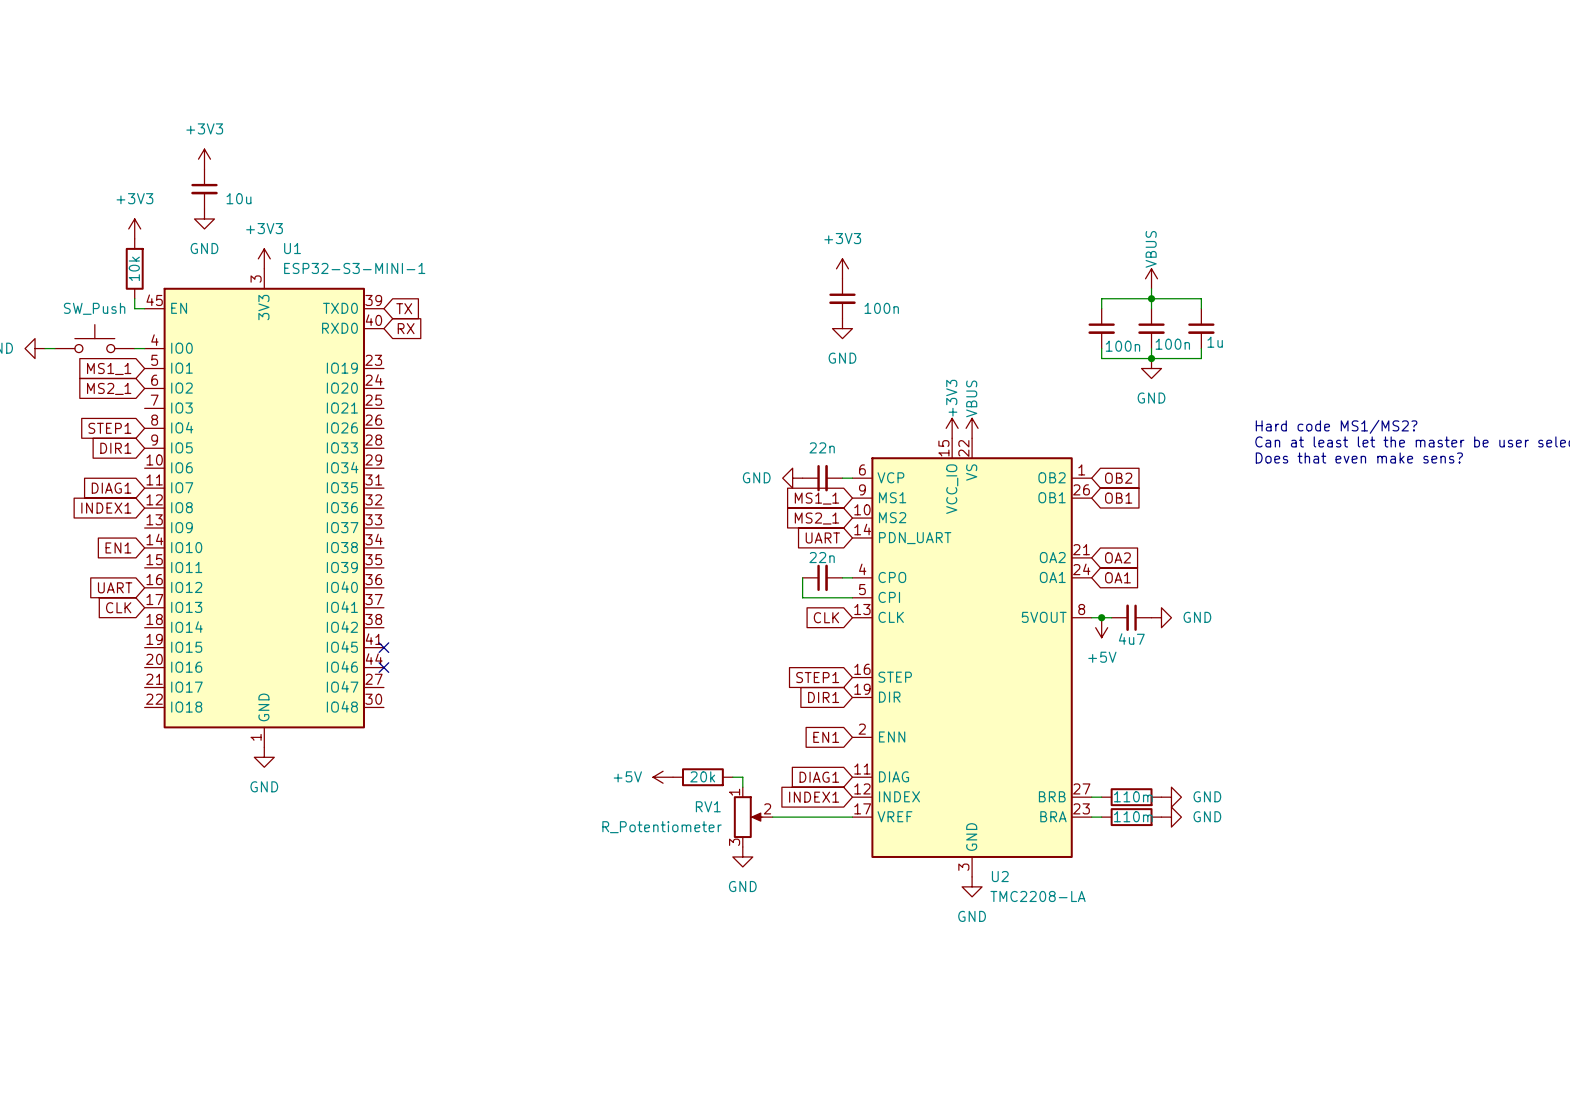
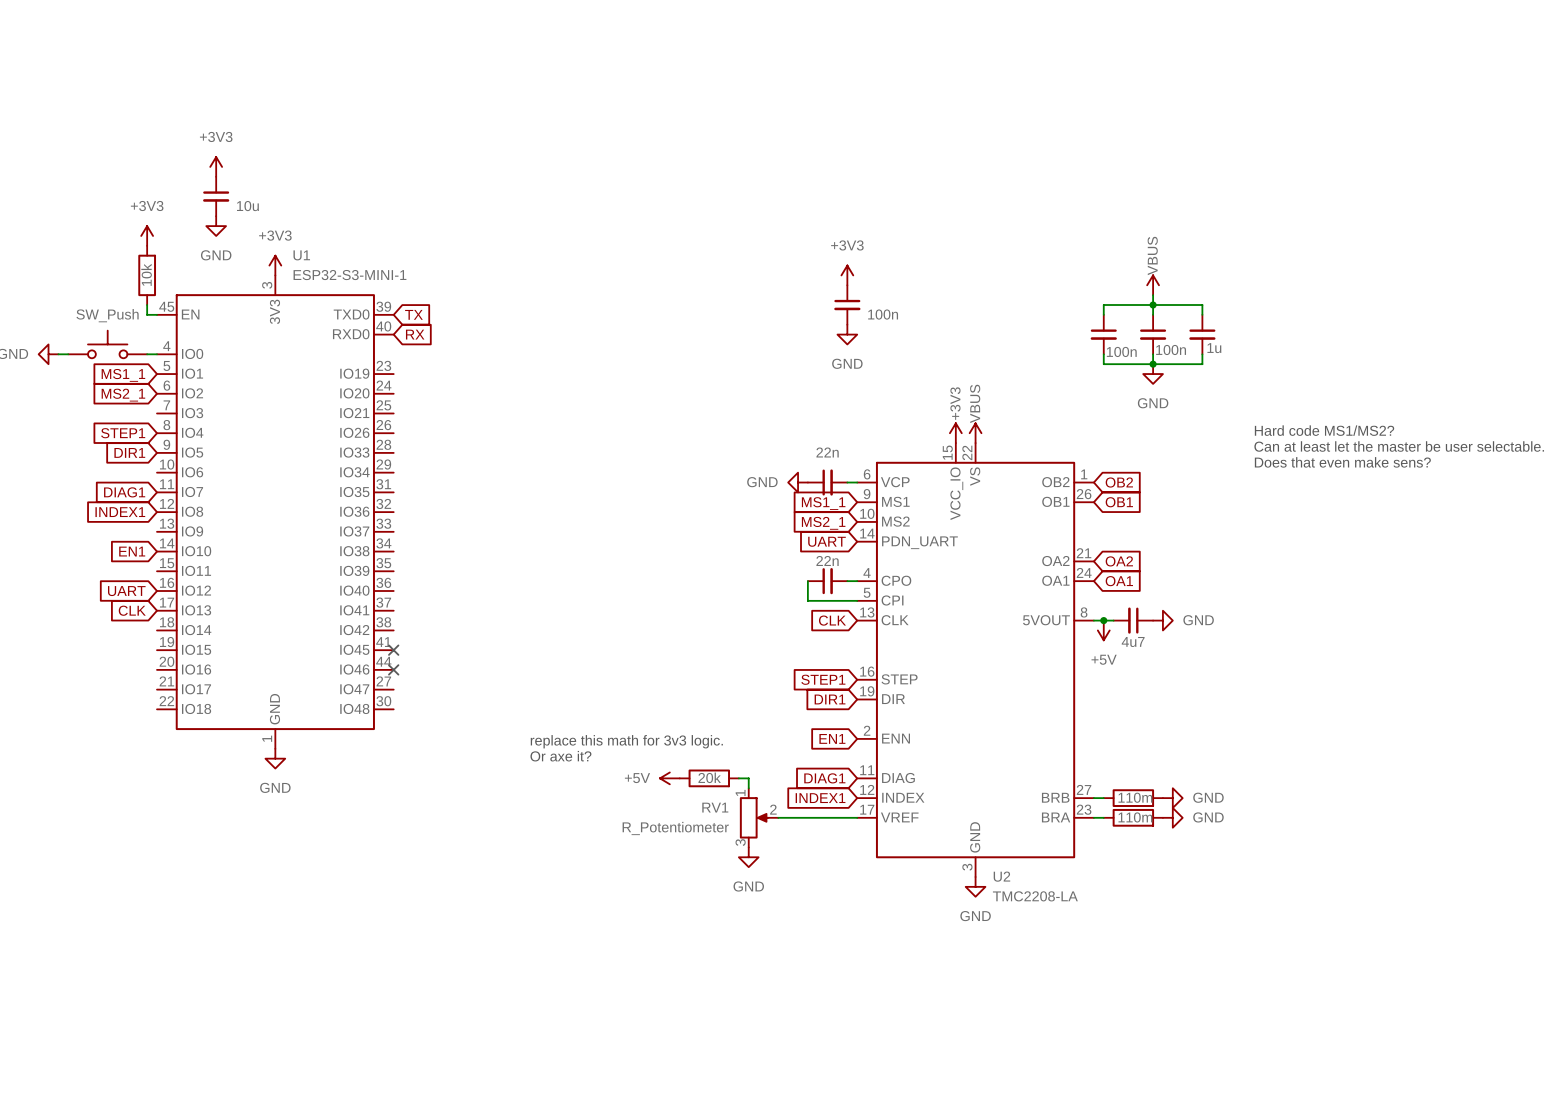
text: none -> replace this math for 3v3 logic. (626, 741)
text: none -> Or axe it? (560, 756)

